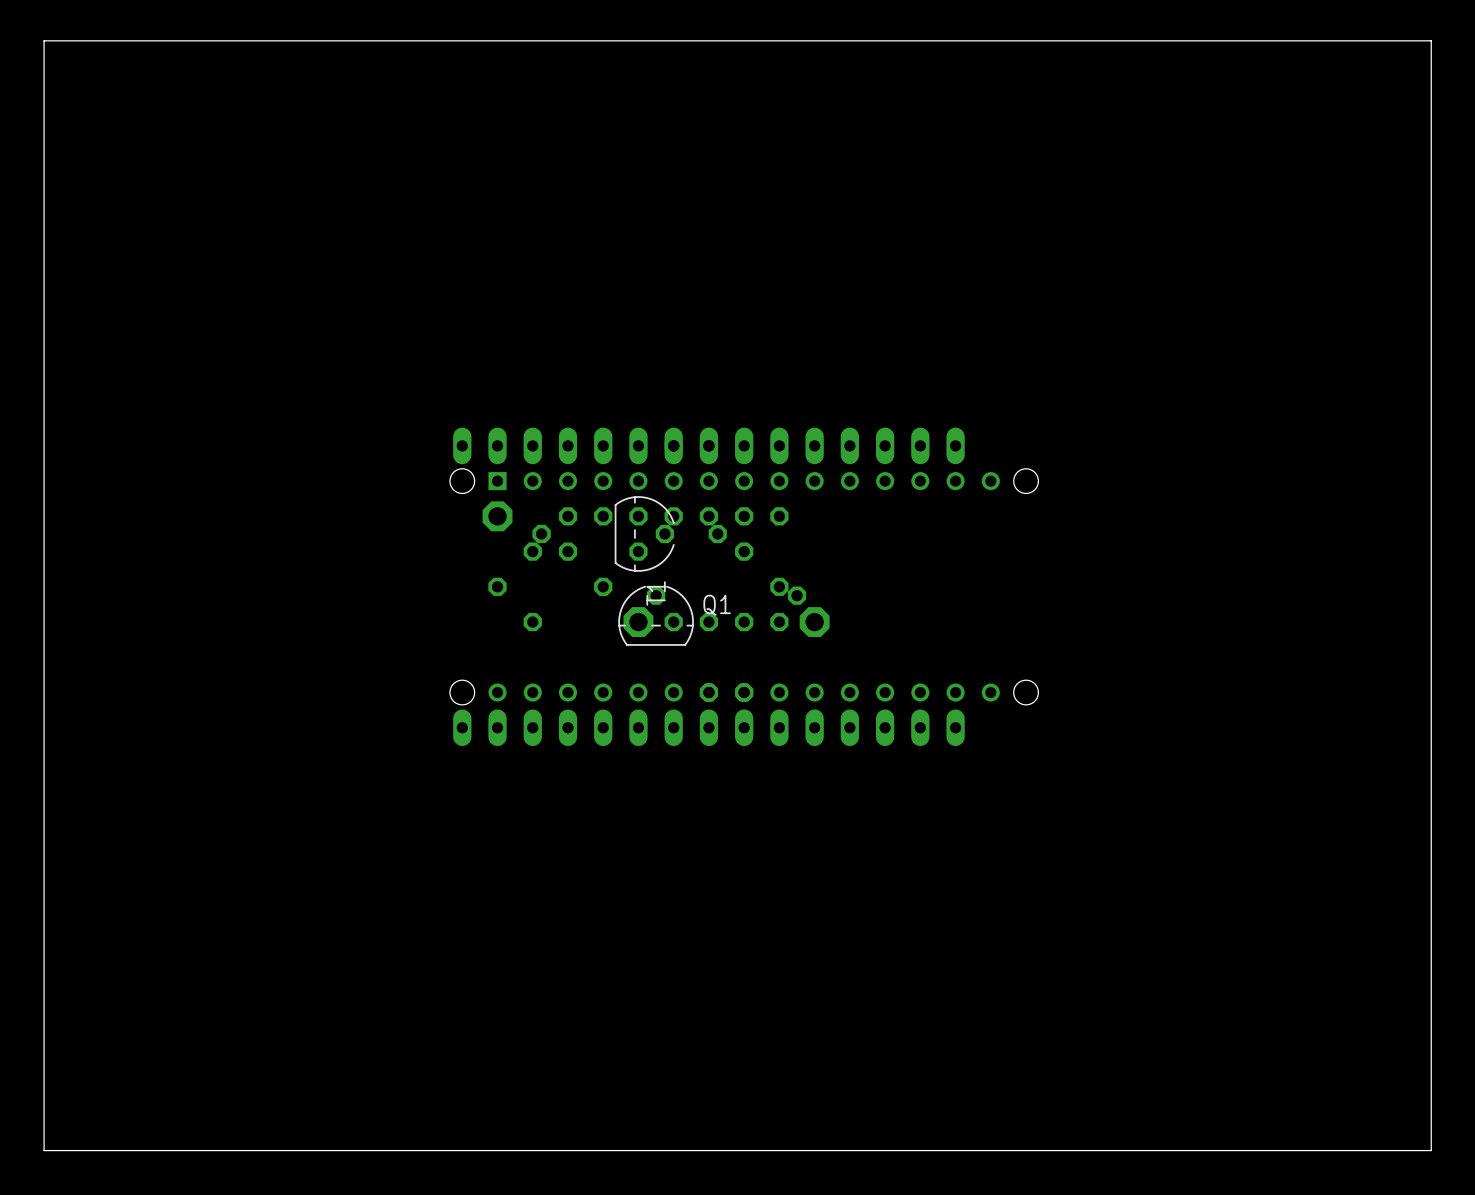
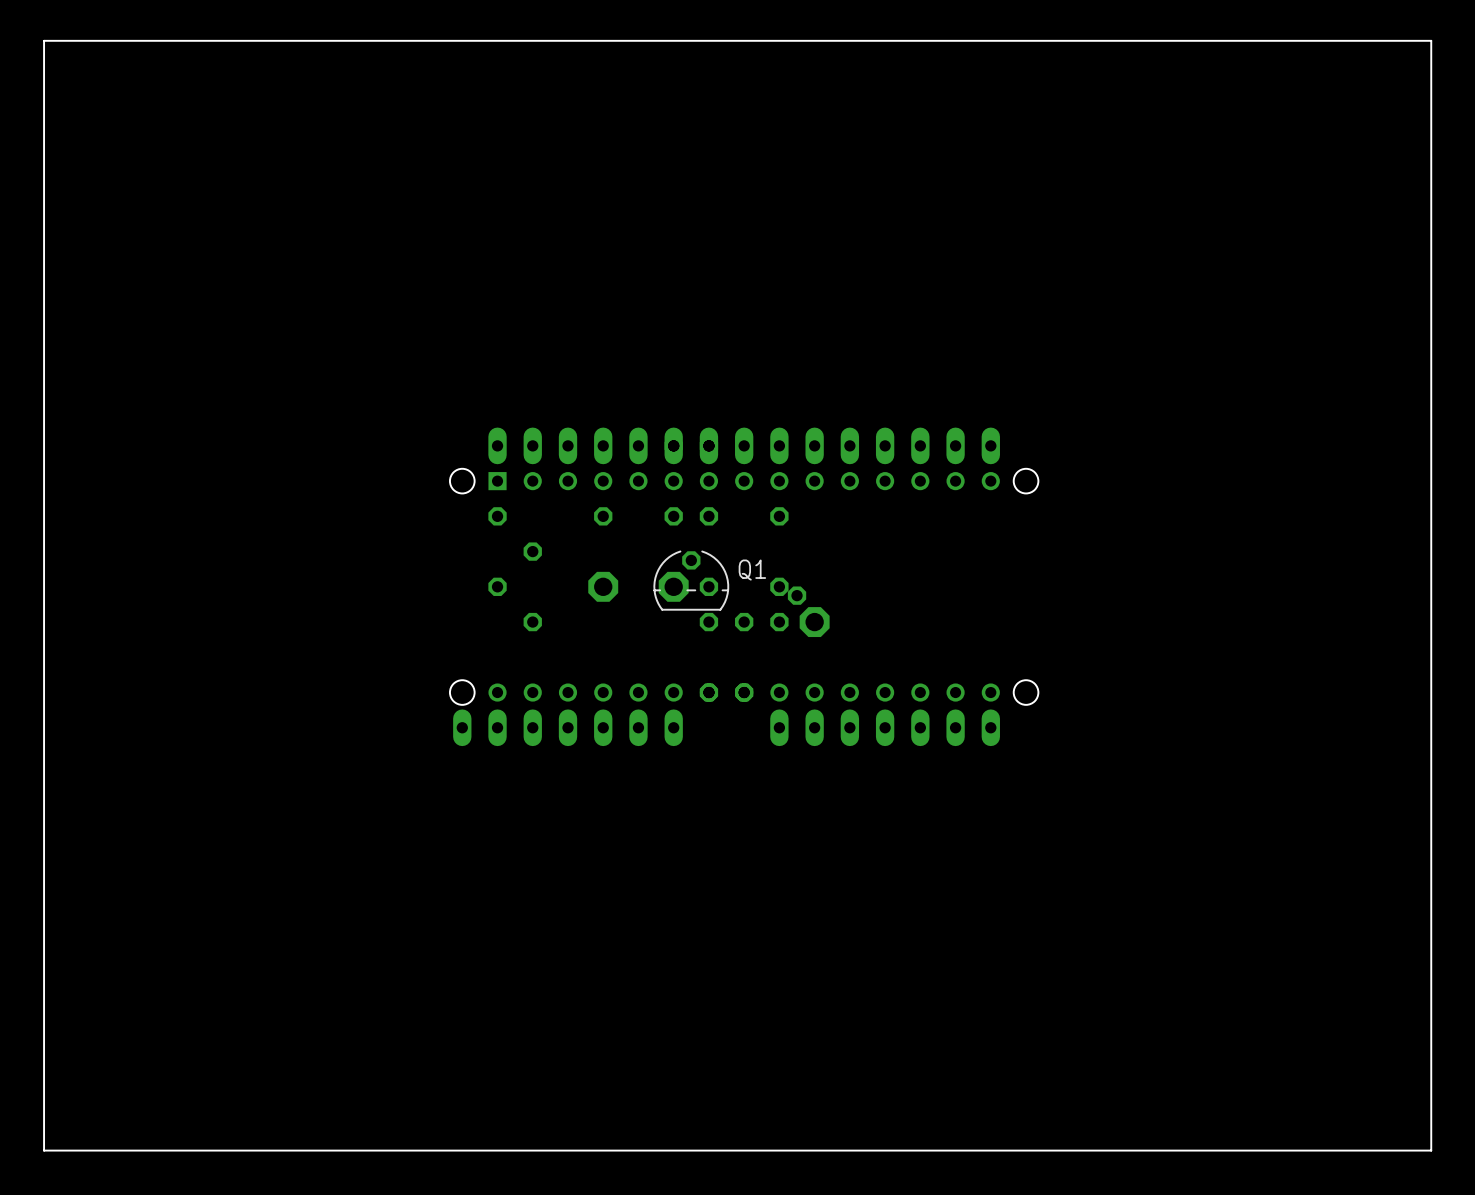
part position: (708, 445) -> (744, 445)
part: (497, 516) -> none
part: (554, 533) -> none
T1: (644, 533) -> none
part: (730, 533) -> none
part: none -> (603, 586)
part: none -> (673, 586)
Q1 position: (656, 615) -> (691, 580)
part: (638, 622) -> none
part: (708, 727) -> none
part: none -> (885, 727)

